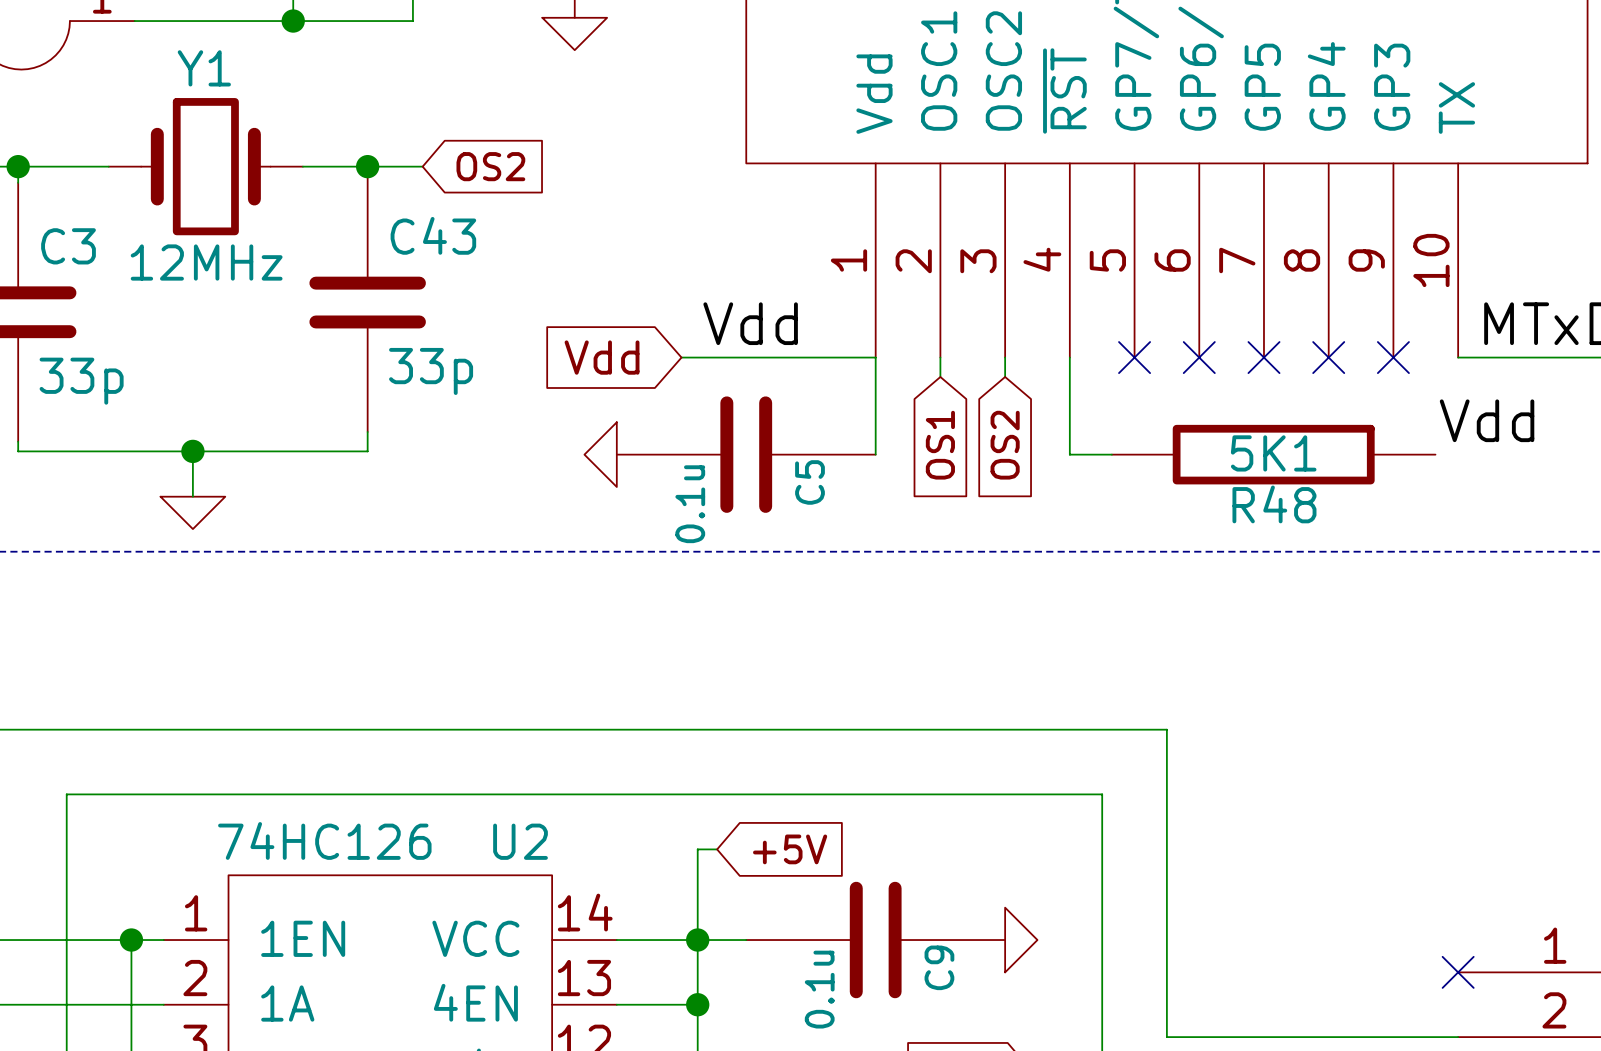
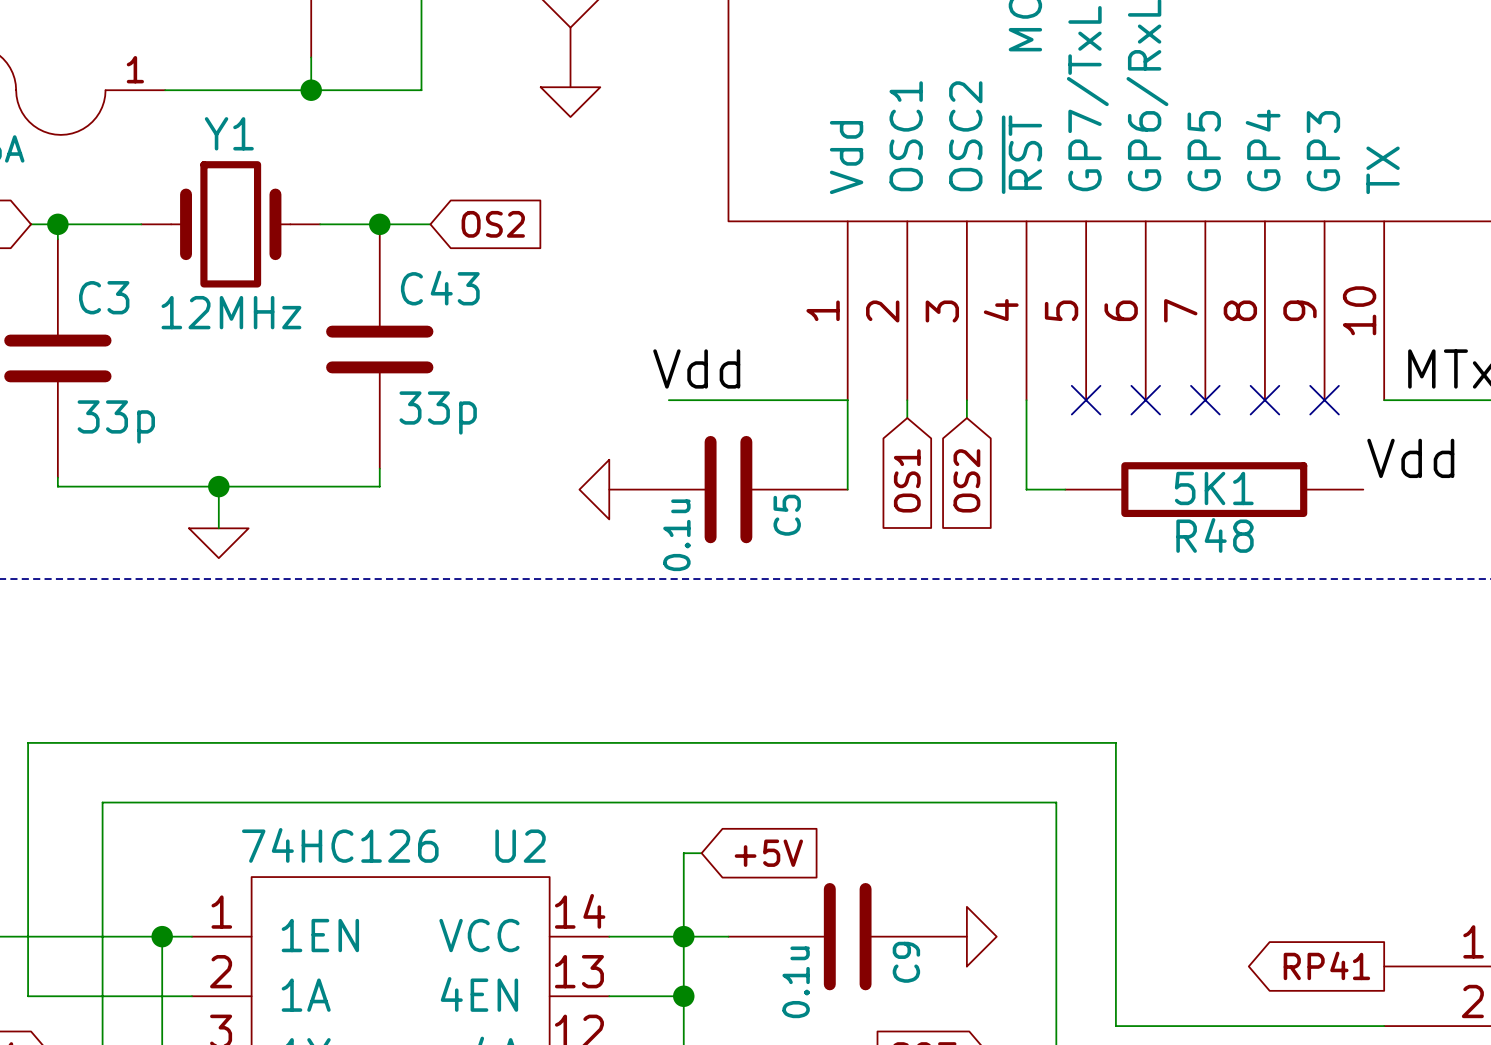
label position: Vdd (750, 323) -> Vdd (696, 368)
global label: Vdd (602, 357) -> none
global label: none -> RP41 (1326, 965)
no-connect mark: (1458, 972) -> none

